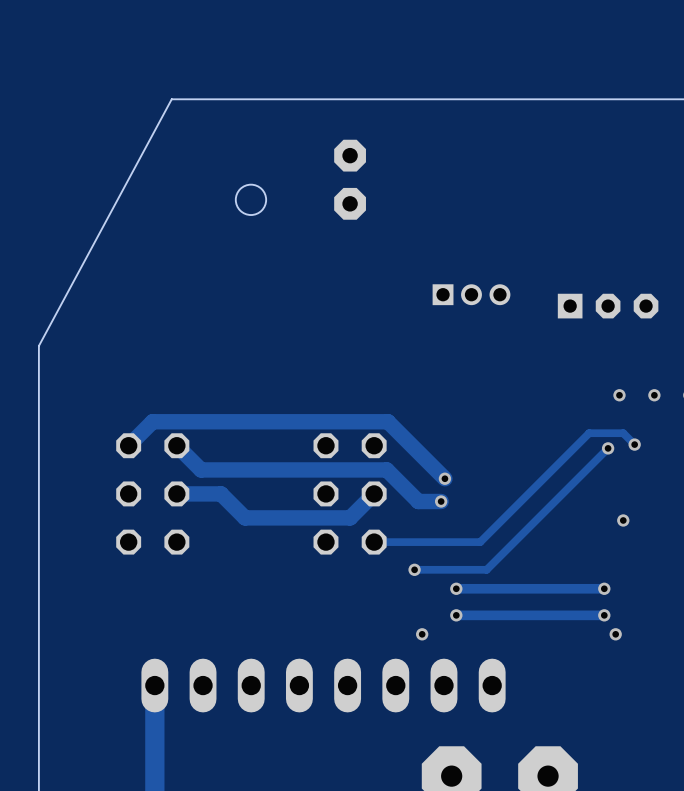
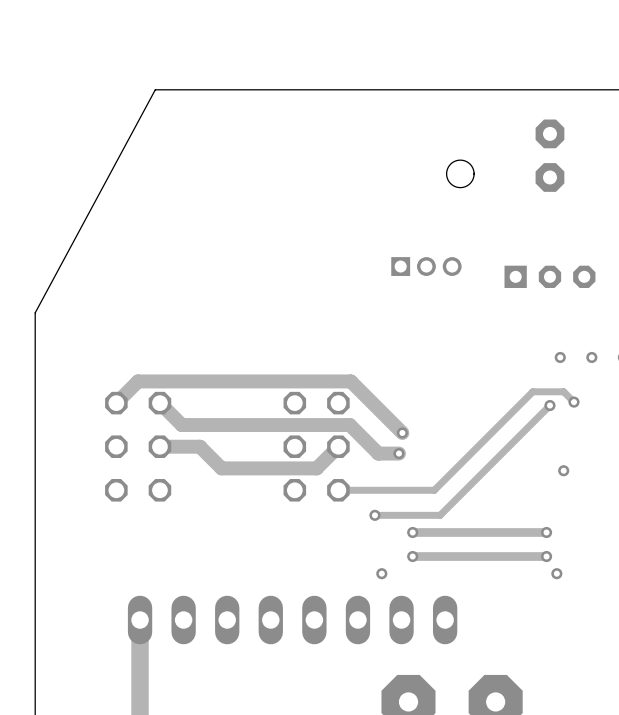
part position: (350, 179) -> (549, 155)
round board edge: [235, 184, 267, 216] -> none
board edge: none -> (474, 173) (469, 183) (460, 187) (450, 183) (446, 173) (450, 164) (460, 160) (469, 163) (474, 173)

